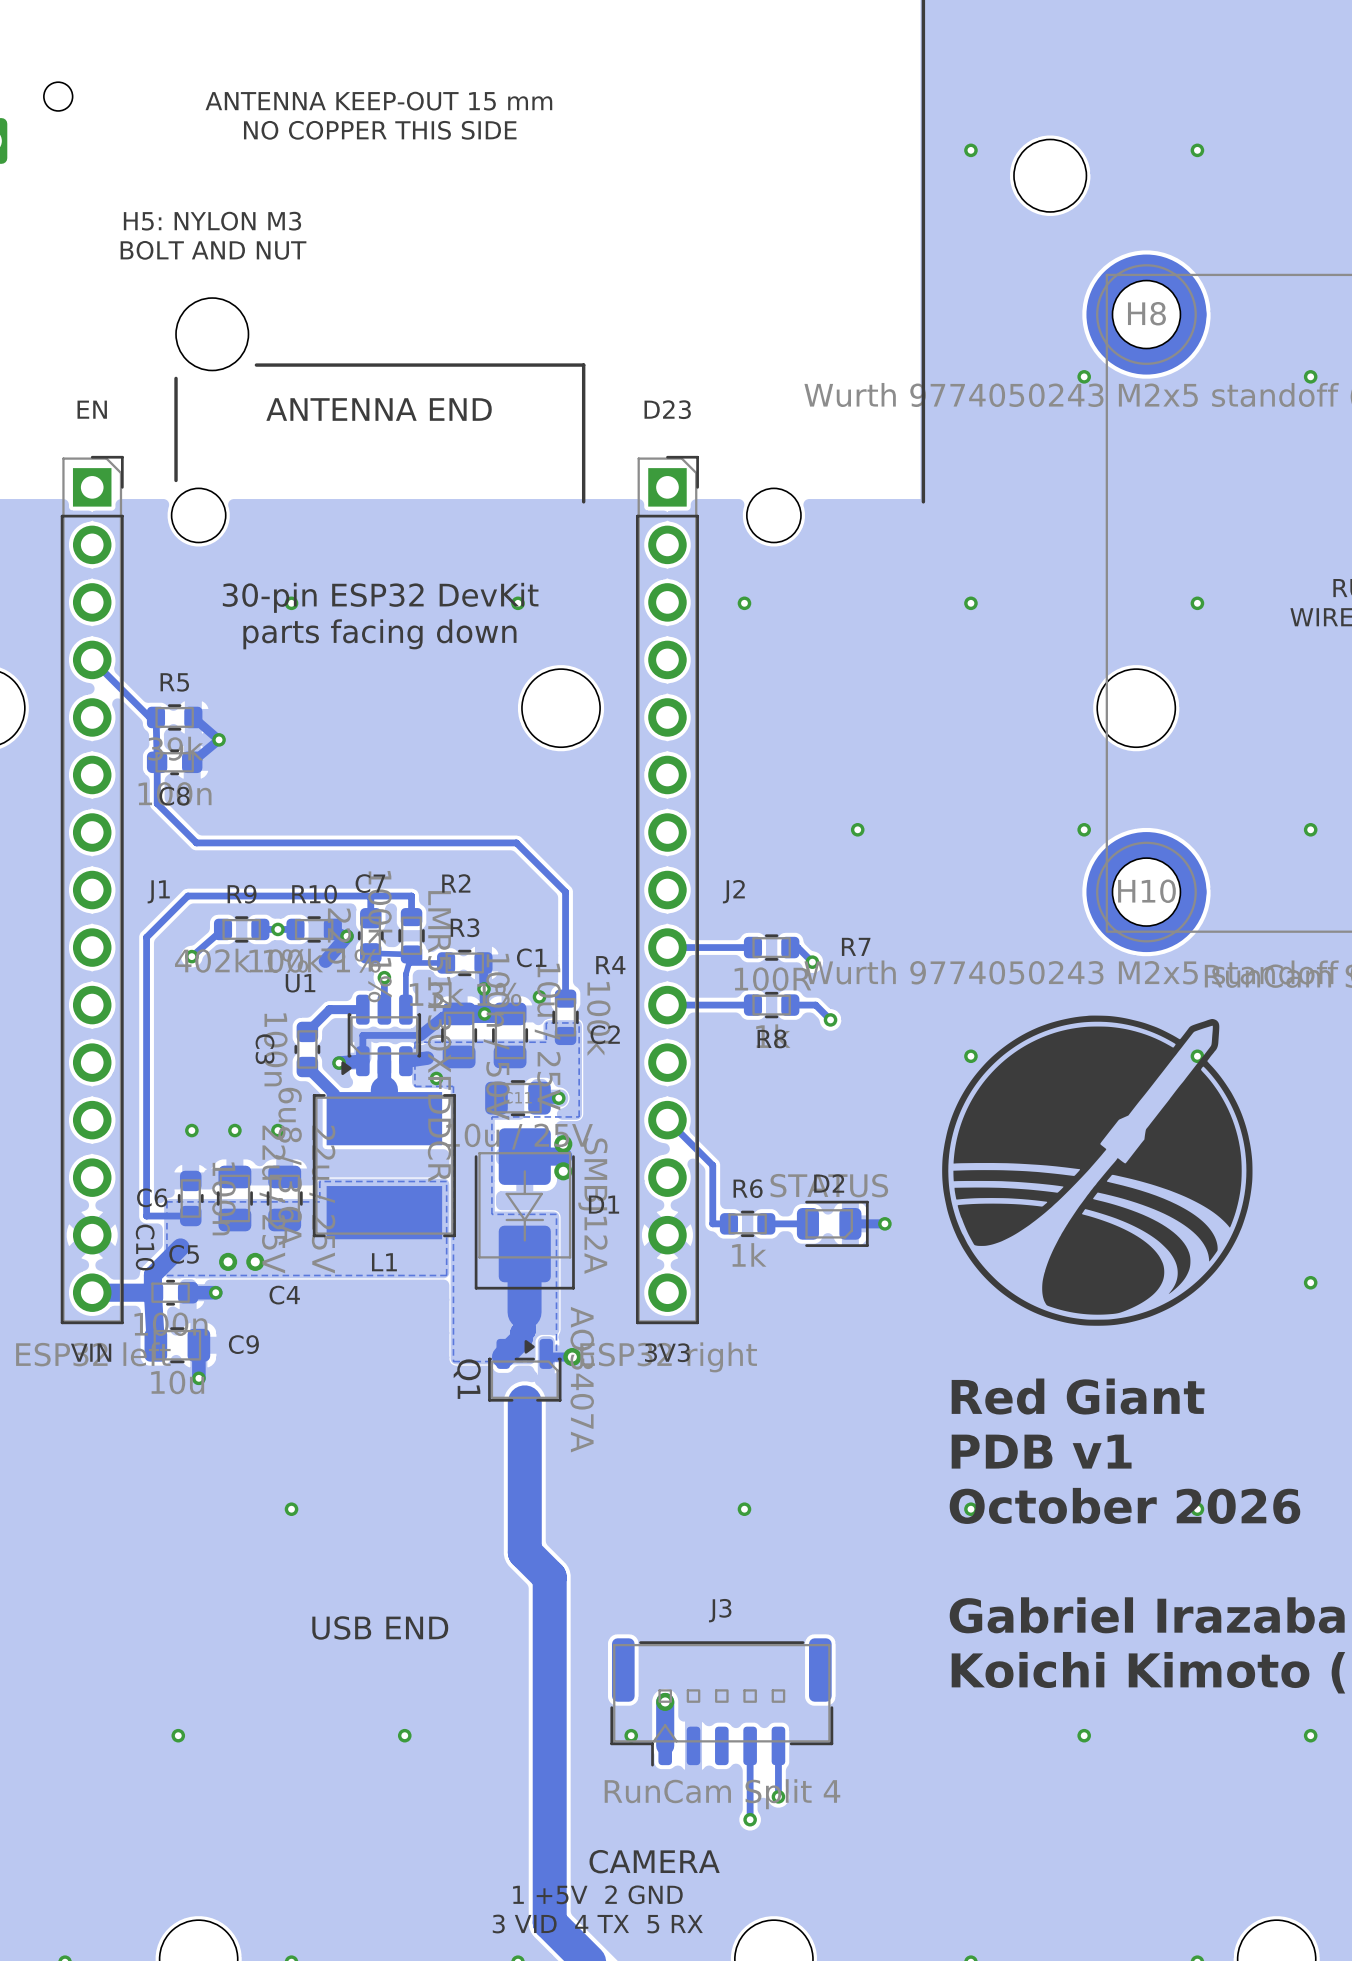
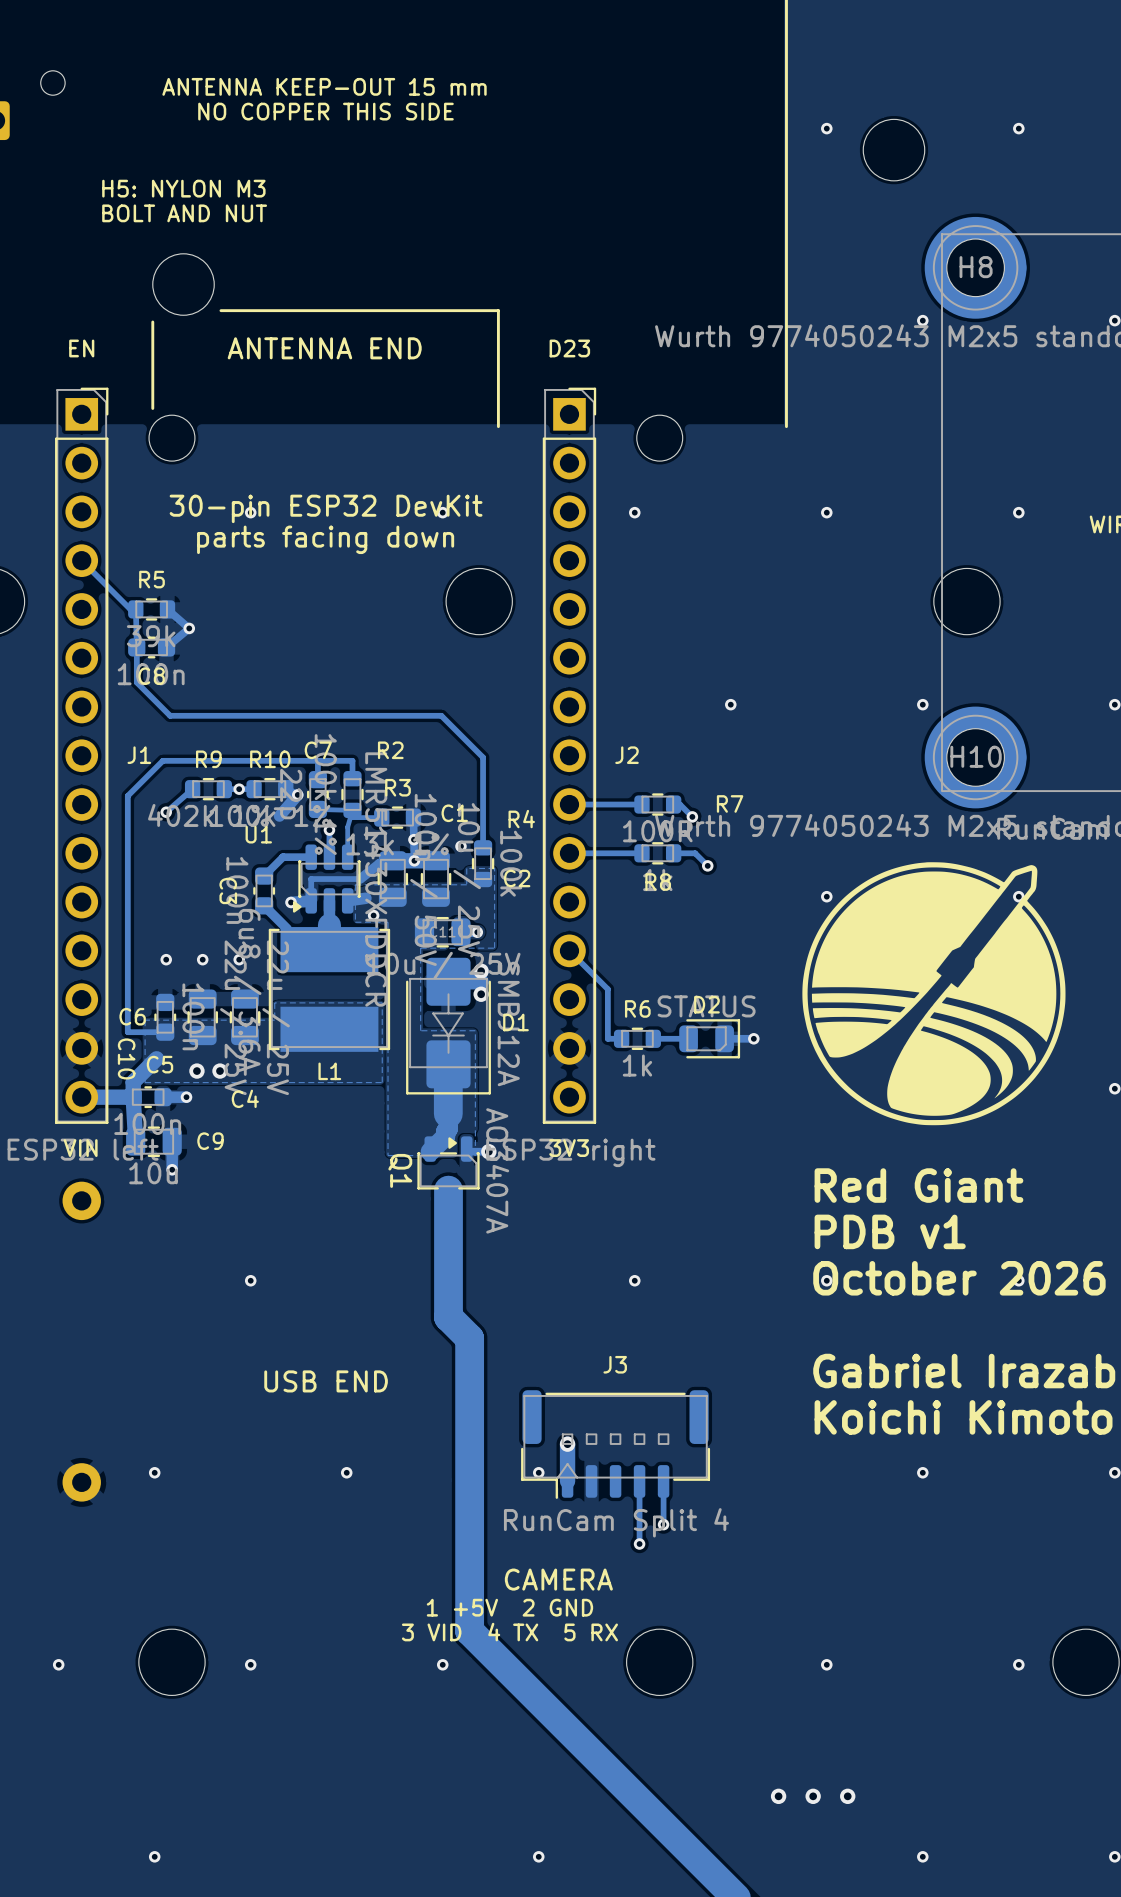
part: none -> (81, 1200)
part: none -> (81, 1482)

